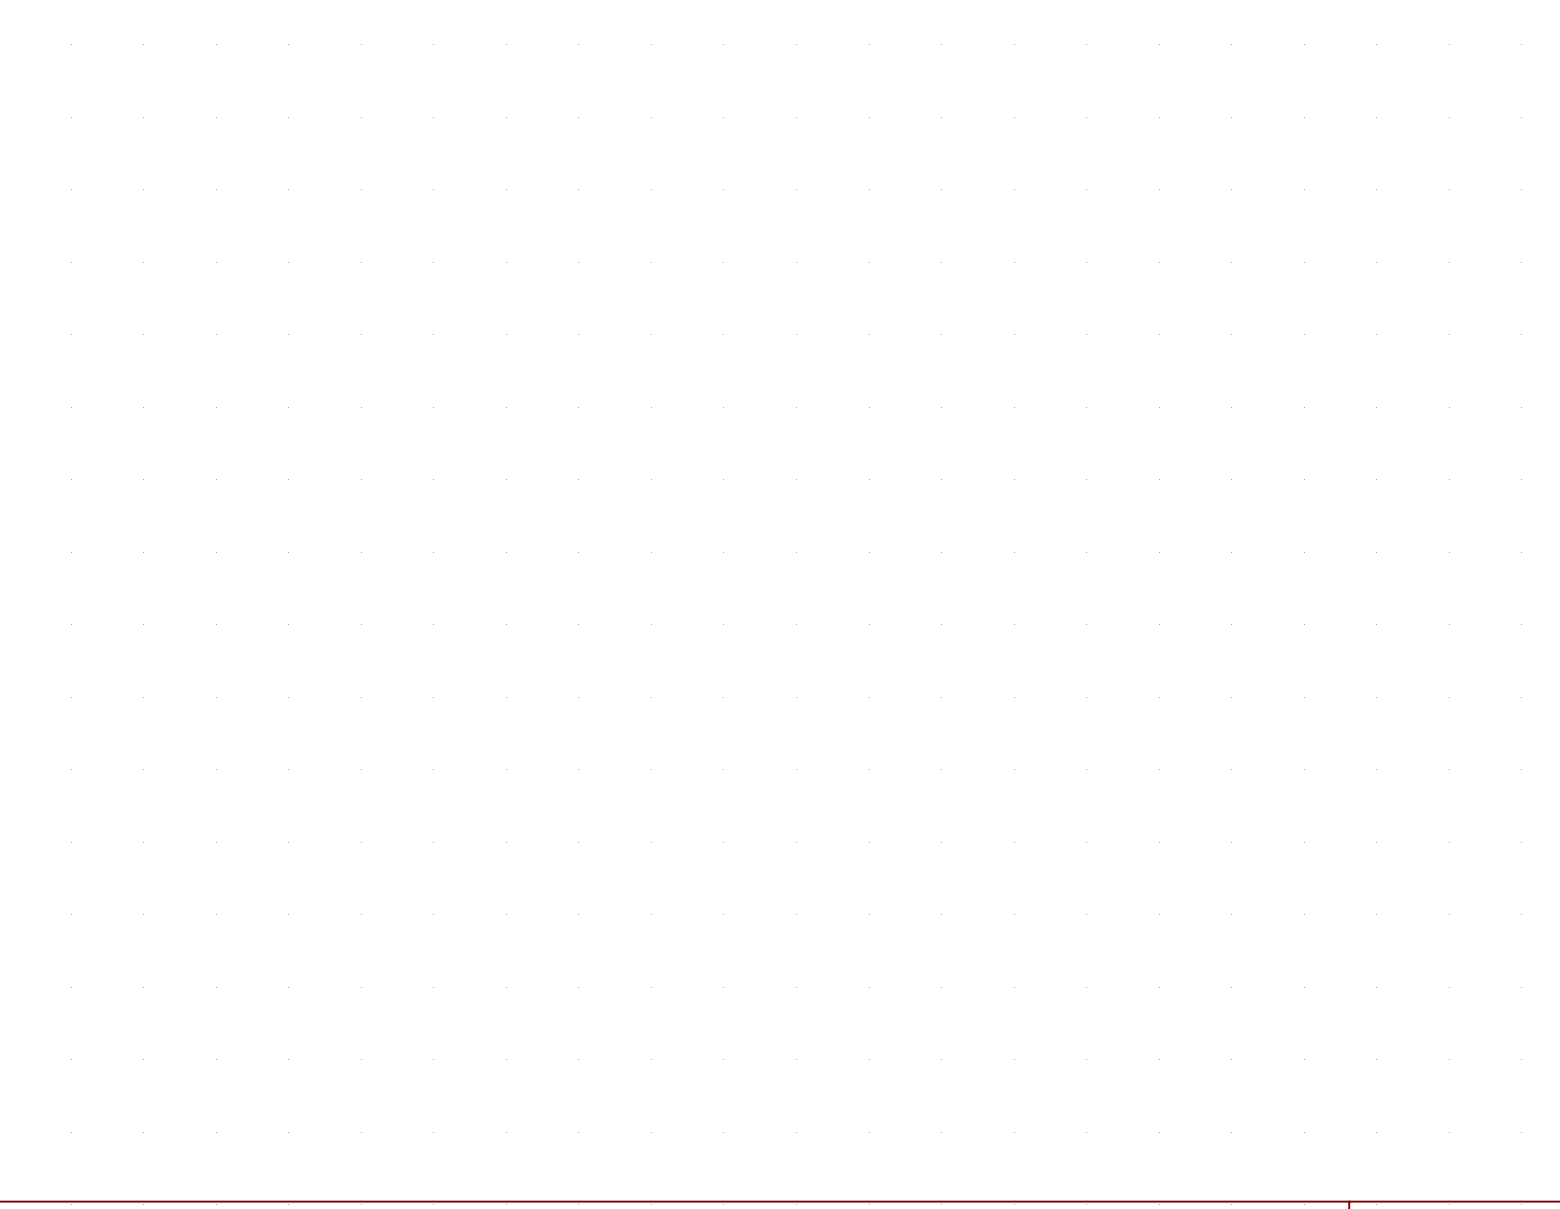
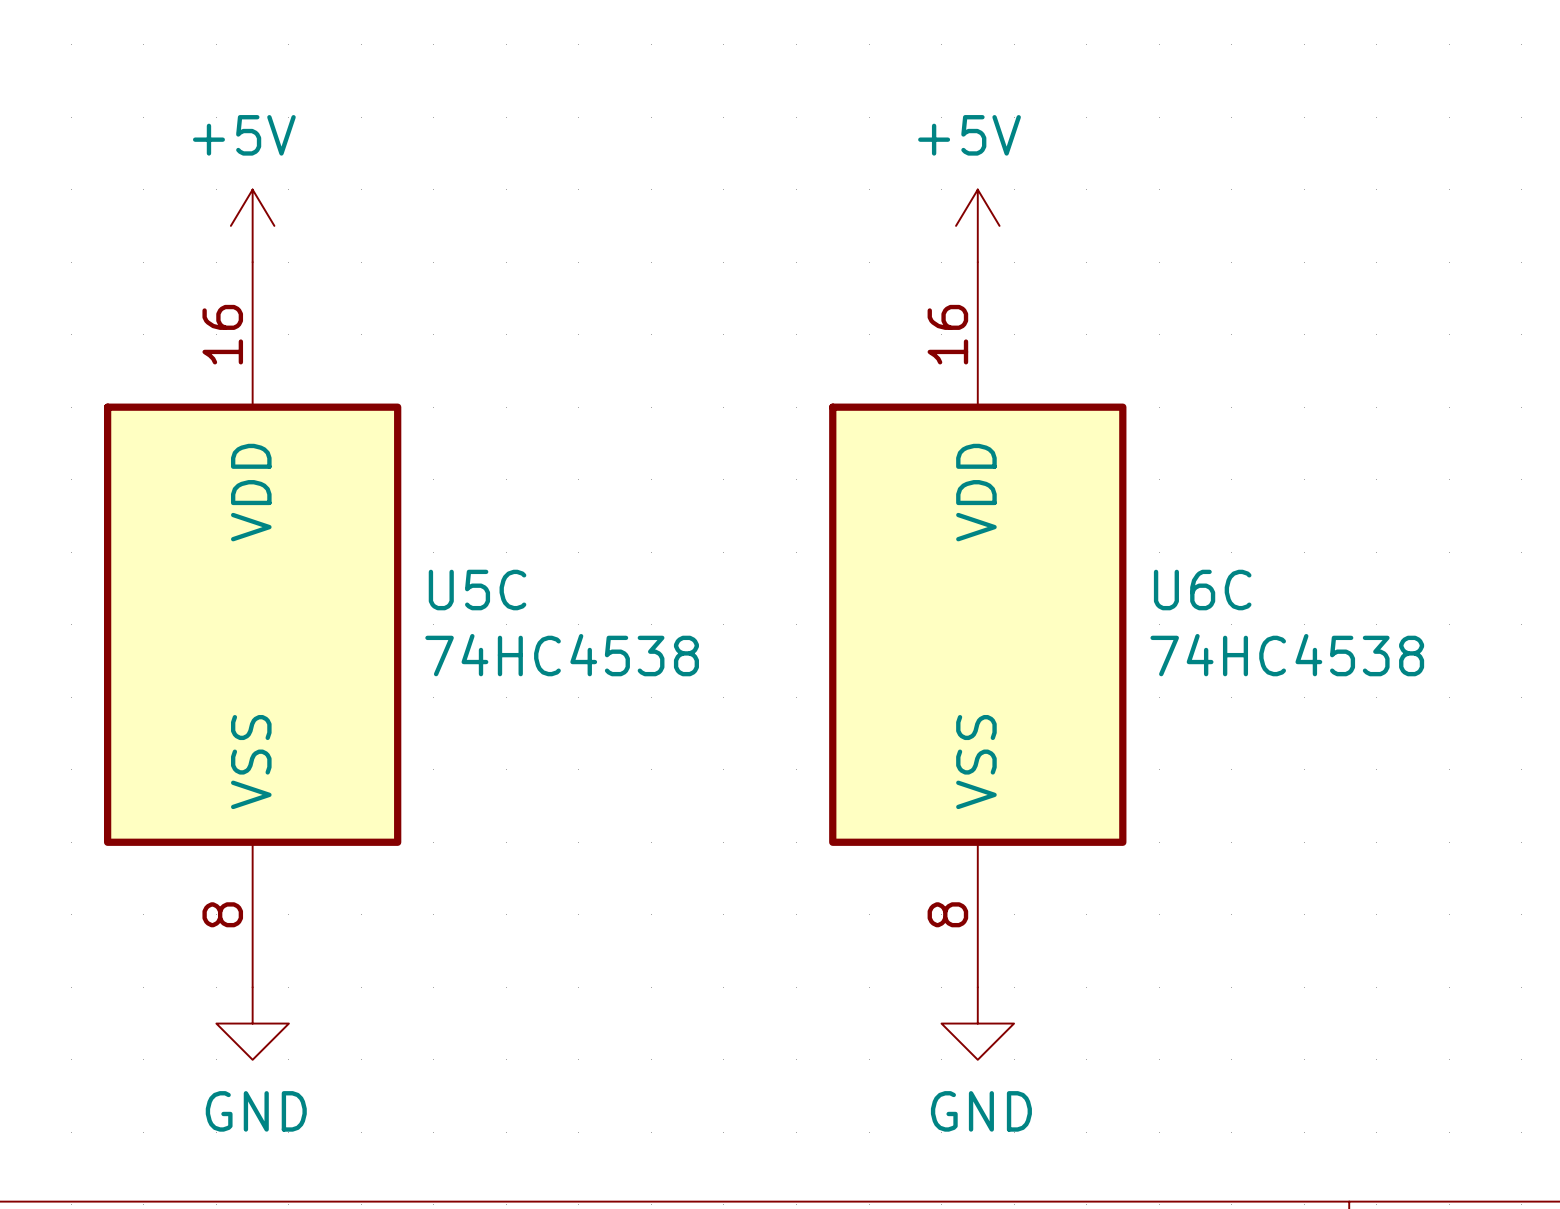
power symbol: none -> +5V (252, 225)
power symbol: none -> +5V (977, 225)
U5C: none -> 74HC4538 (252, 624)
U6C: none -> 74HC4538 (977, 624)
power symbol: none -> GND (252, 1023)
power symbol: none -> GND (977, 1023)

